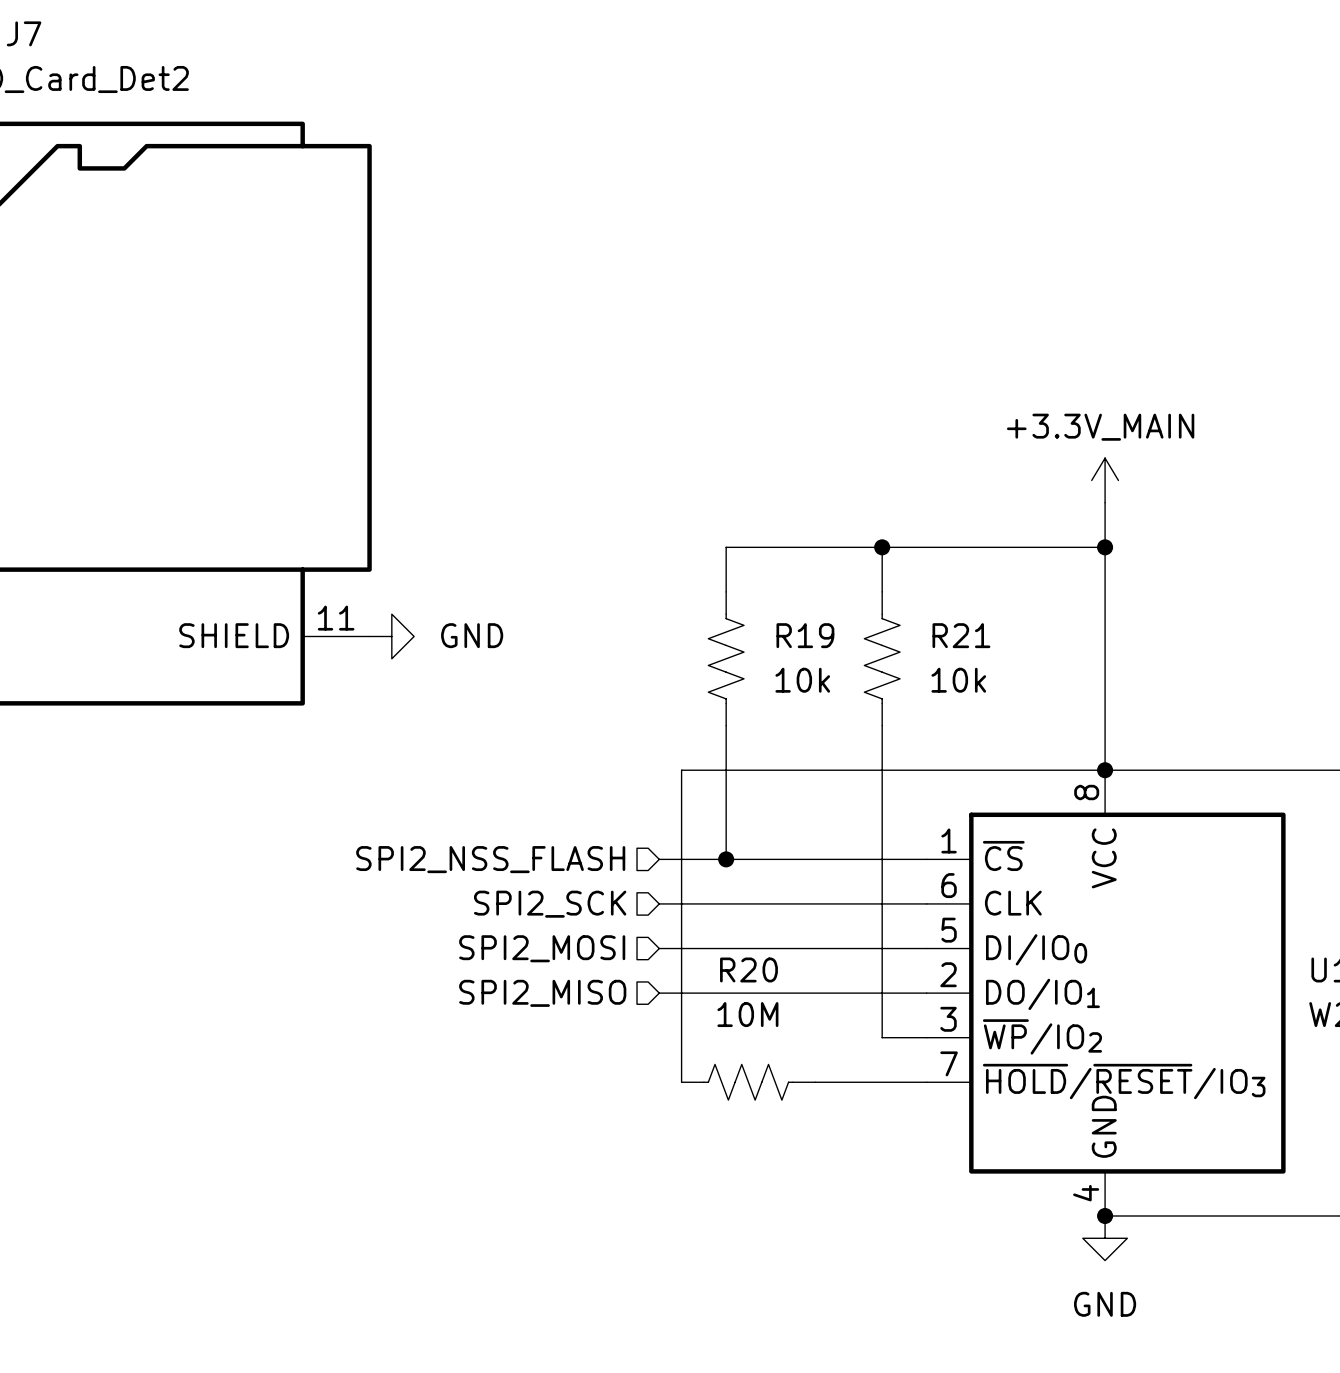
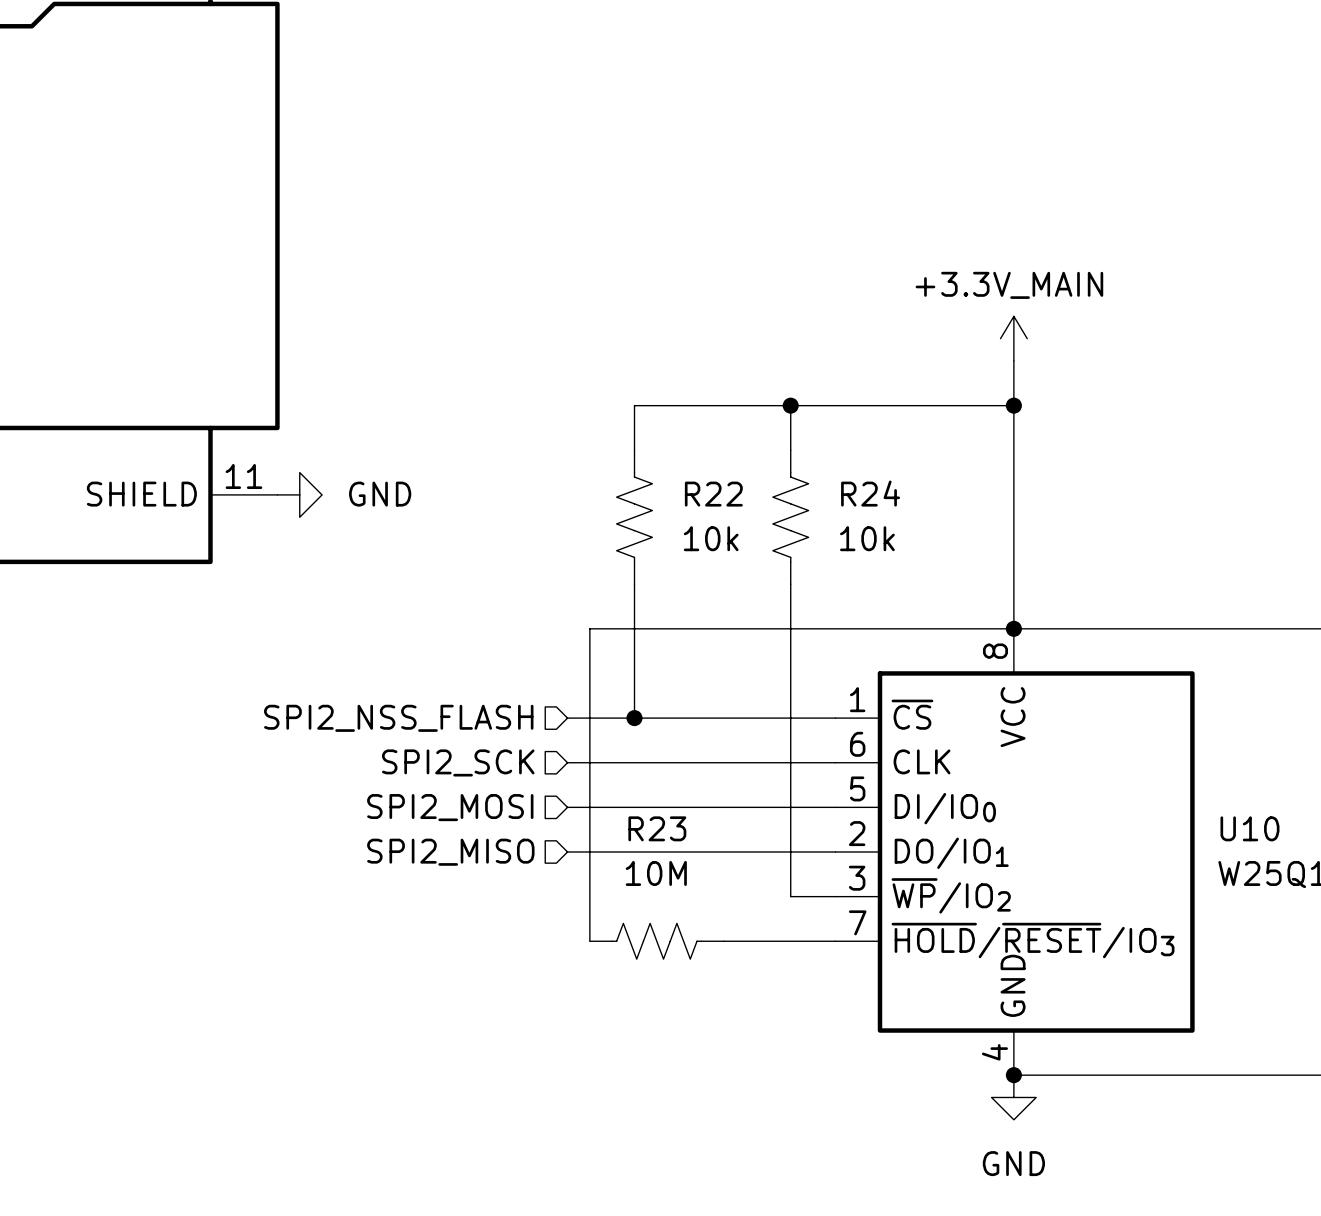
R19 name: R19 (805, 635) -> R22 (713, 494)
R21 name: R21 (961, 635) -> R24 (870, 493)
R20 name: R20 (748, 969) -> R23 (657, 828)

